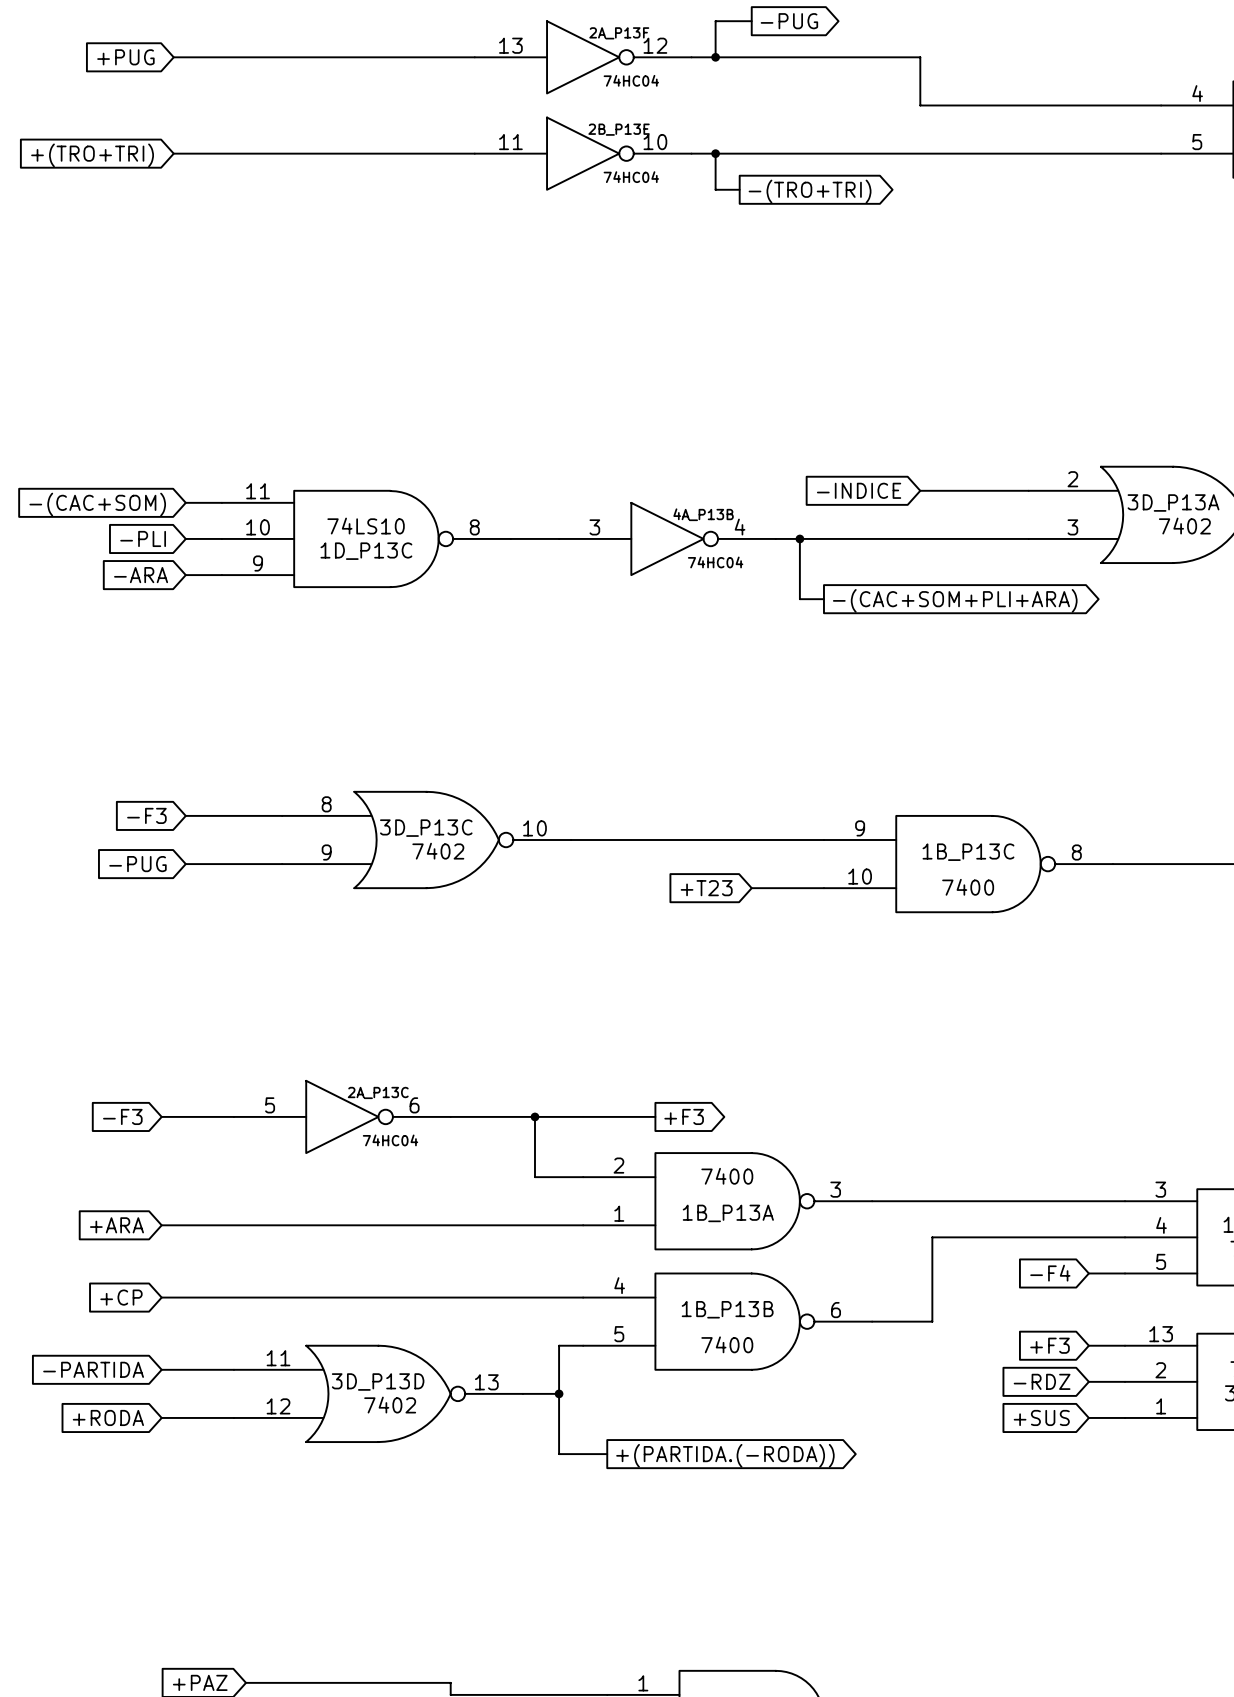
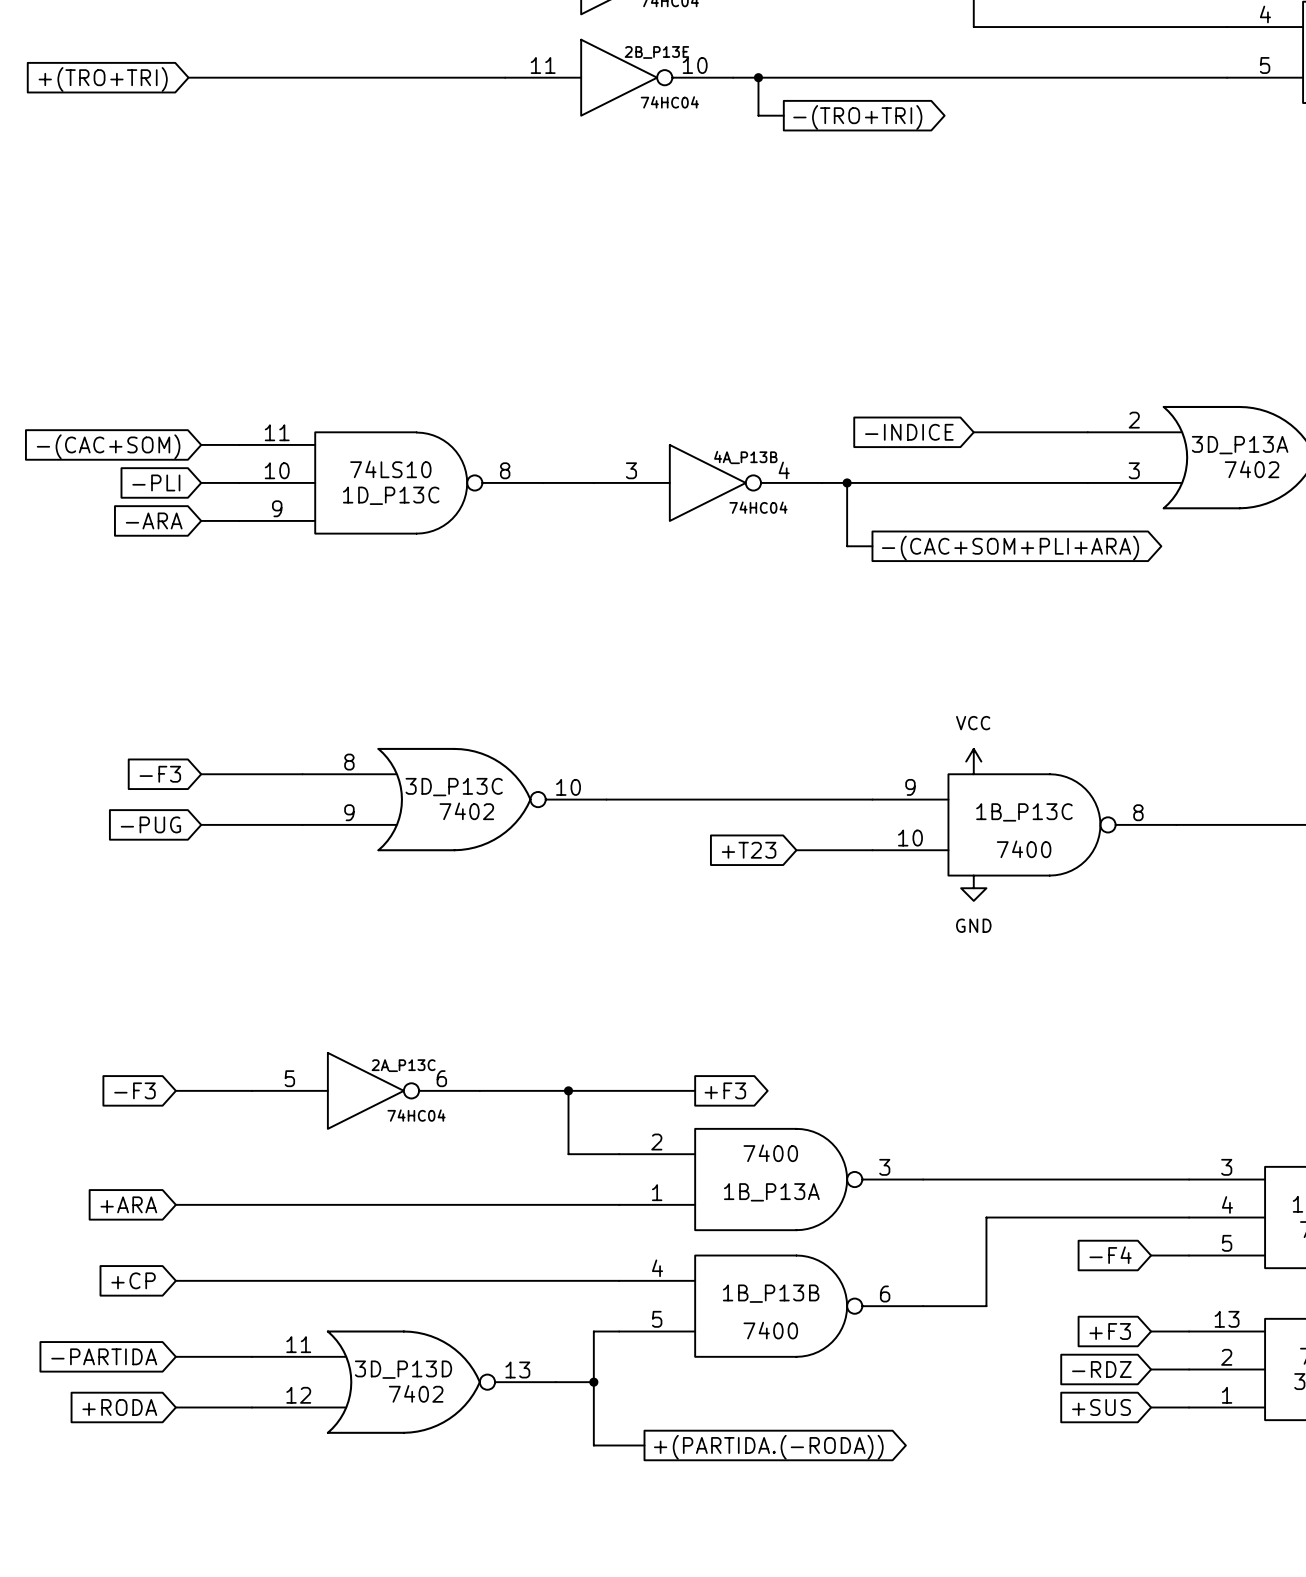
power symbol: none -> VCC (973, 761)
power symbol: none -> GND (973, 888)

